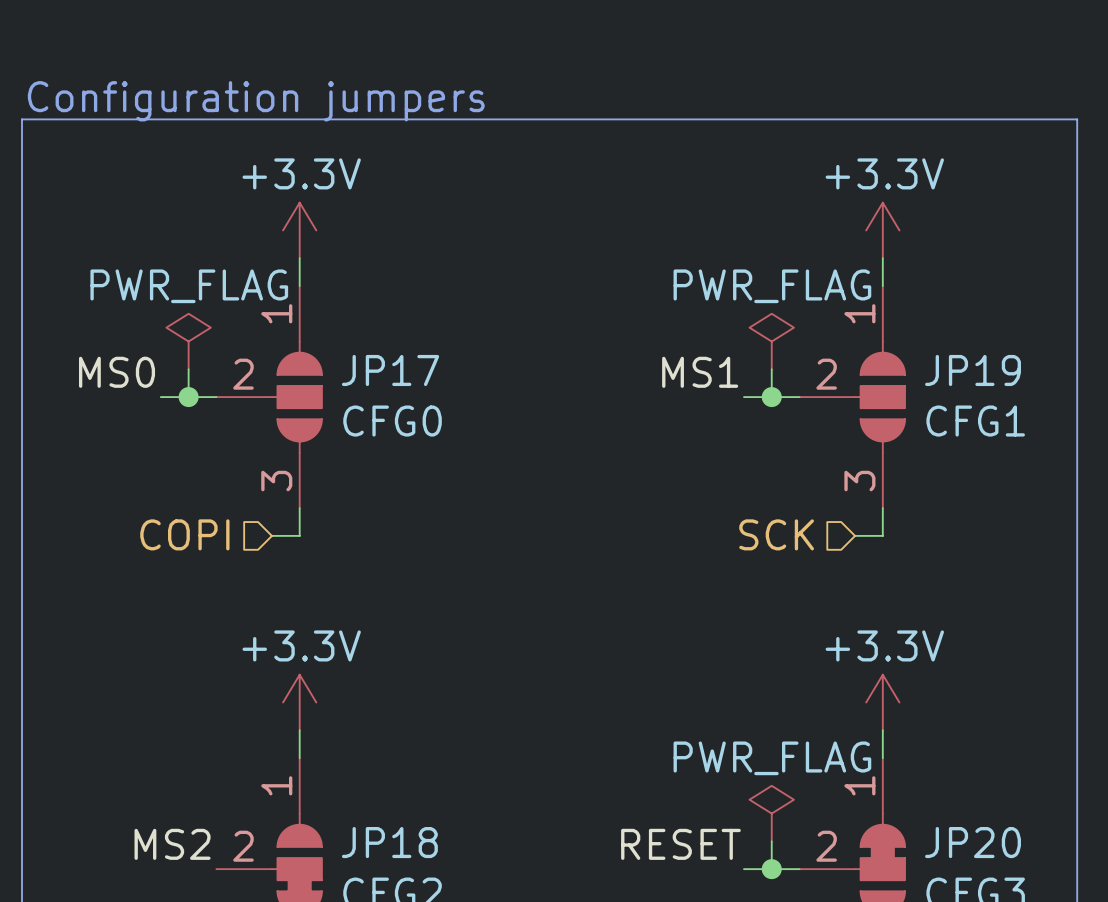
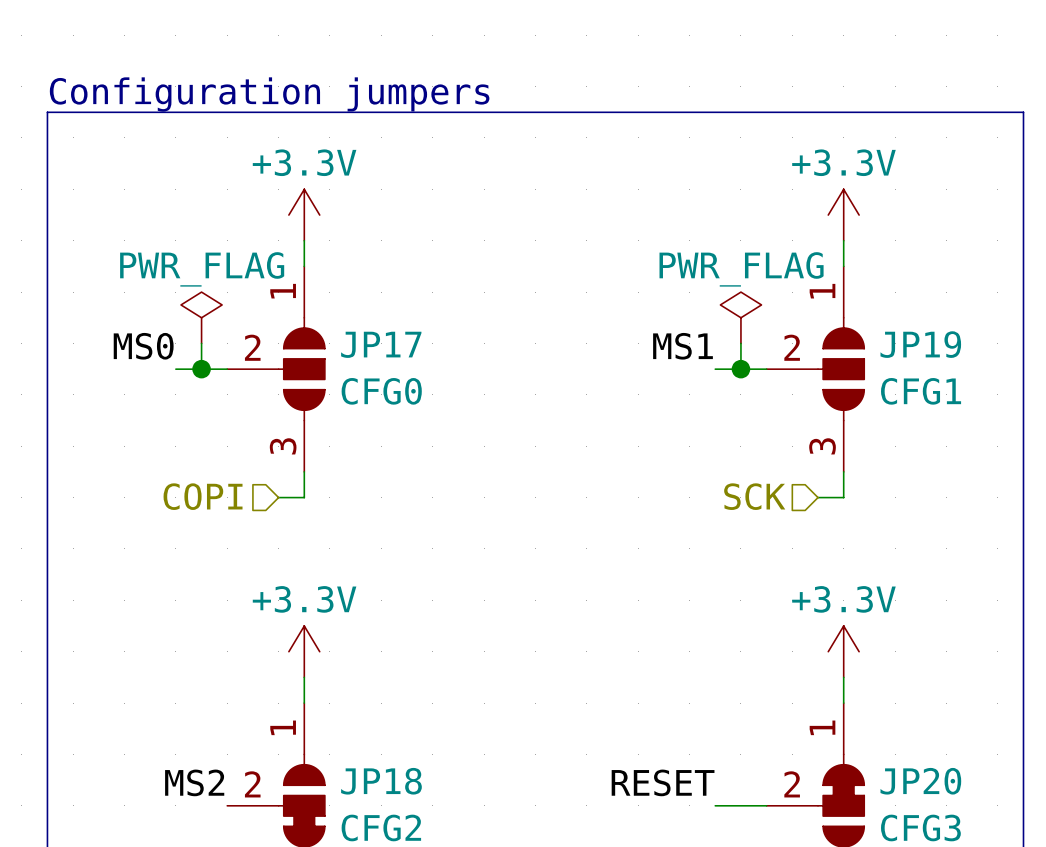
power symbol: PWR_FLAG (771, 813) -> none
wire: (771, 841) (771, 869) -> none
junction: (771, 869) -> none

